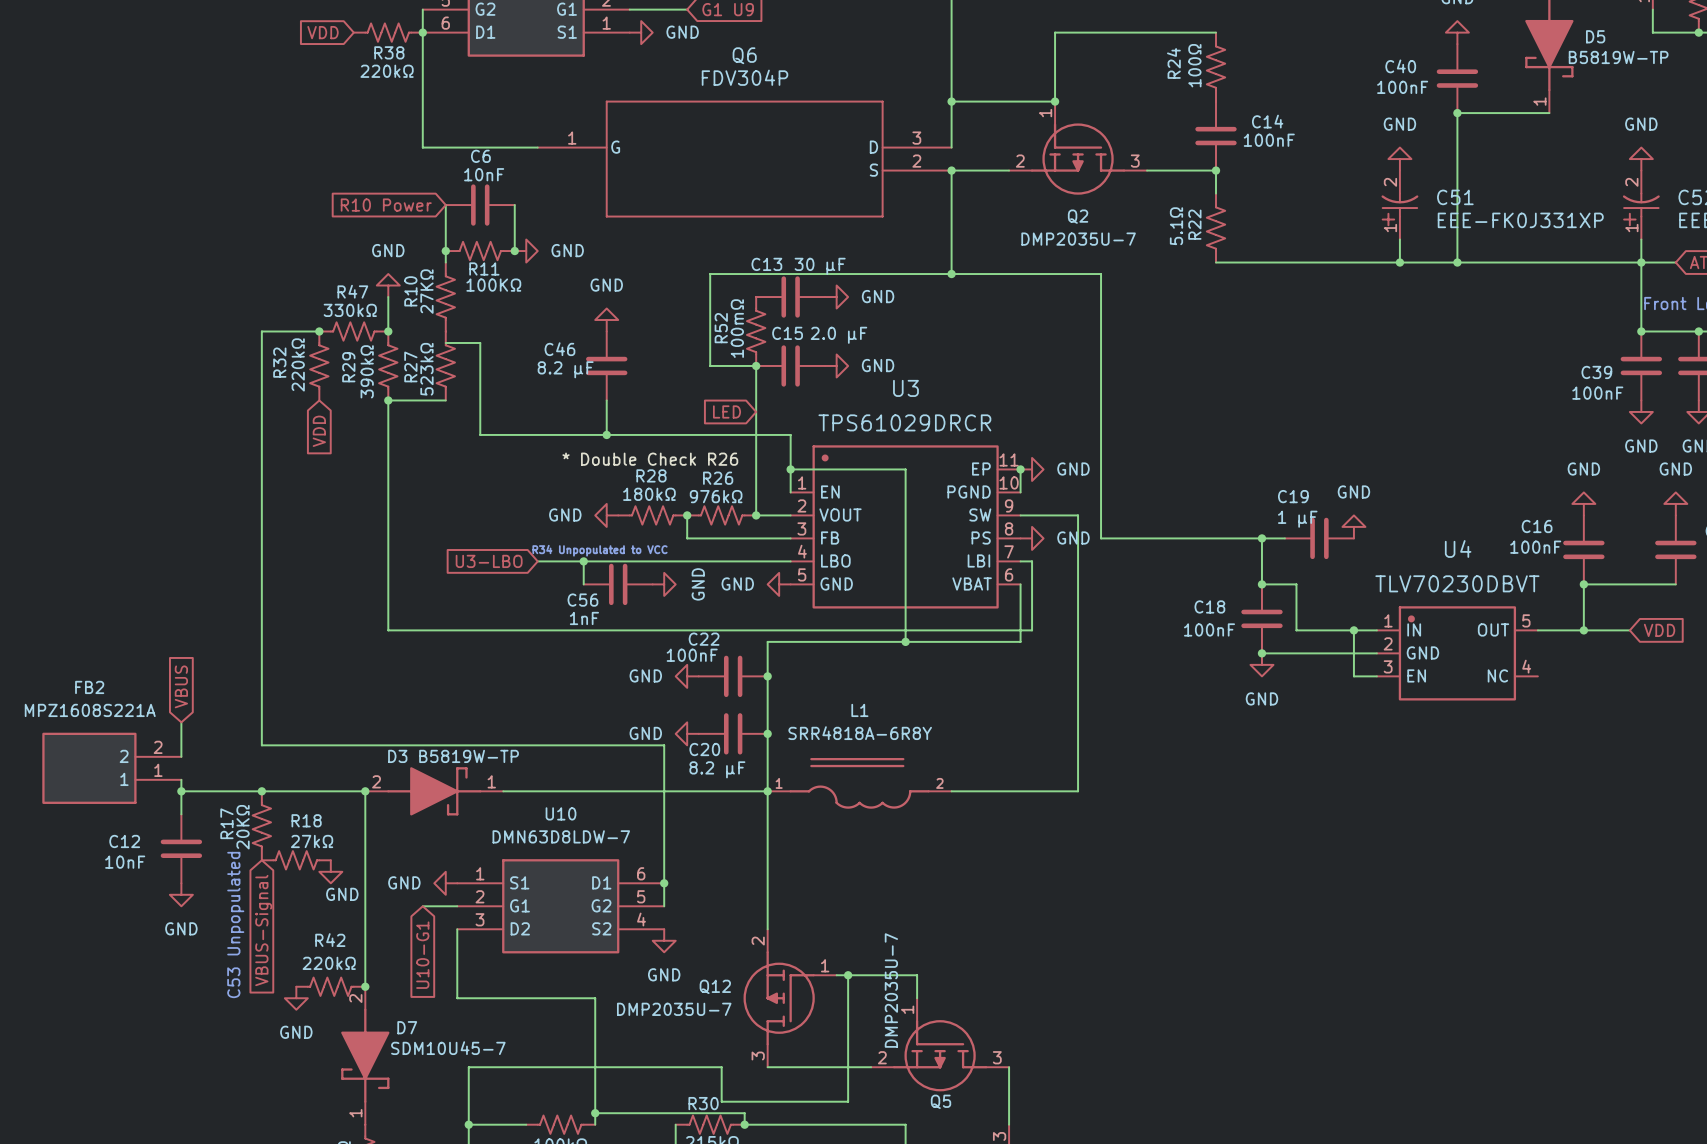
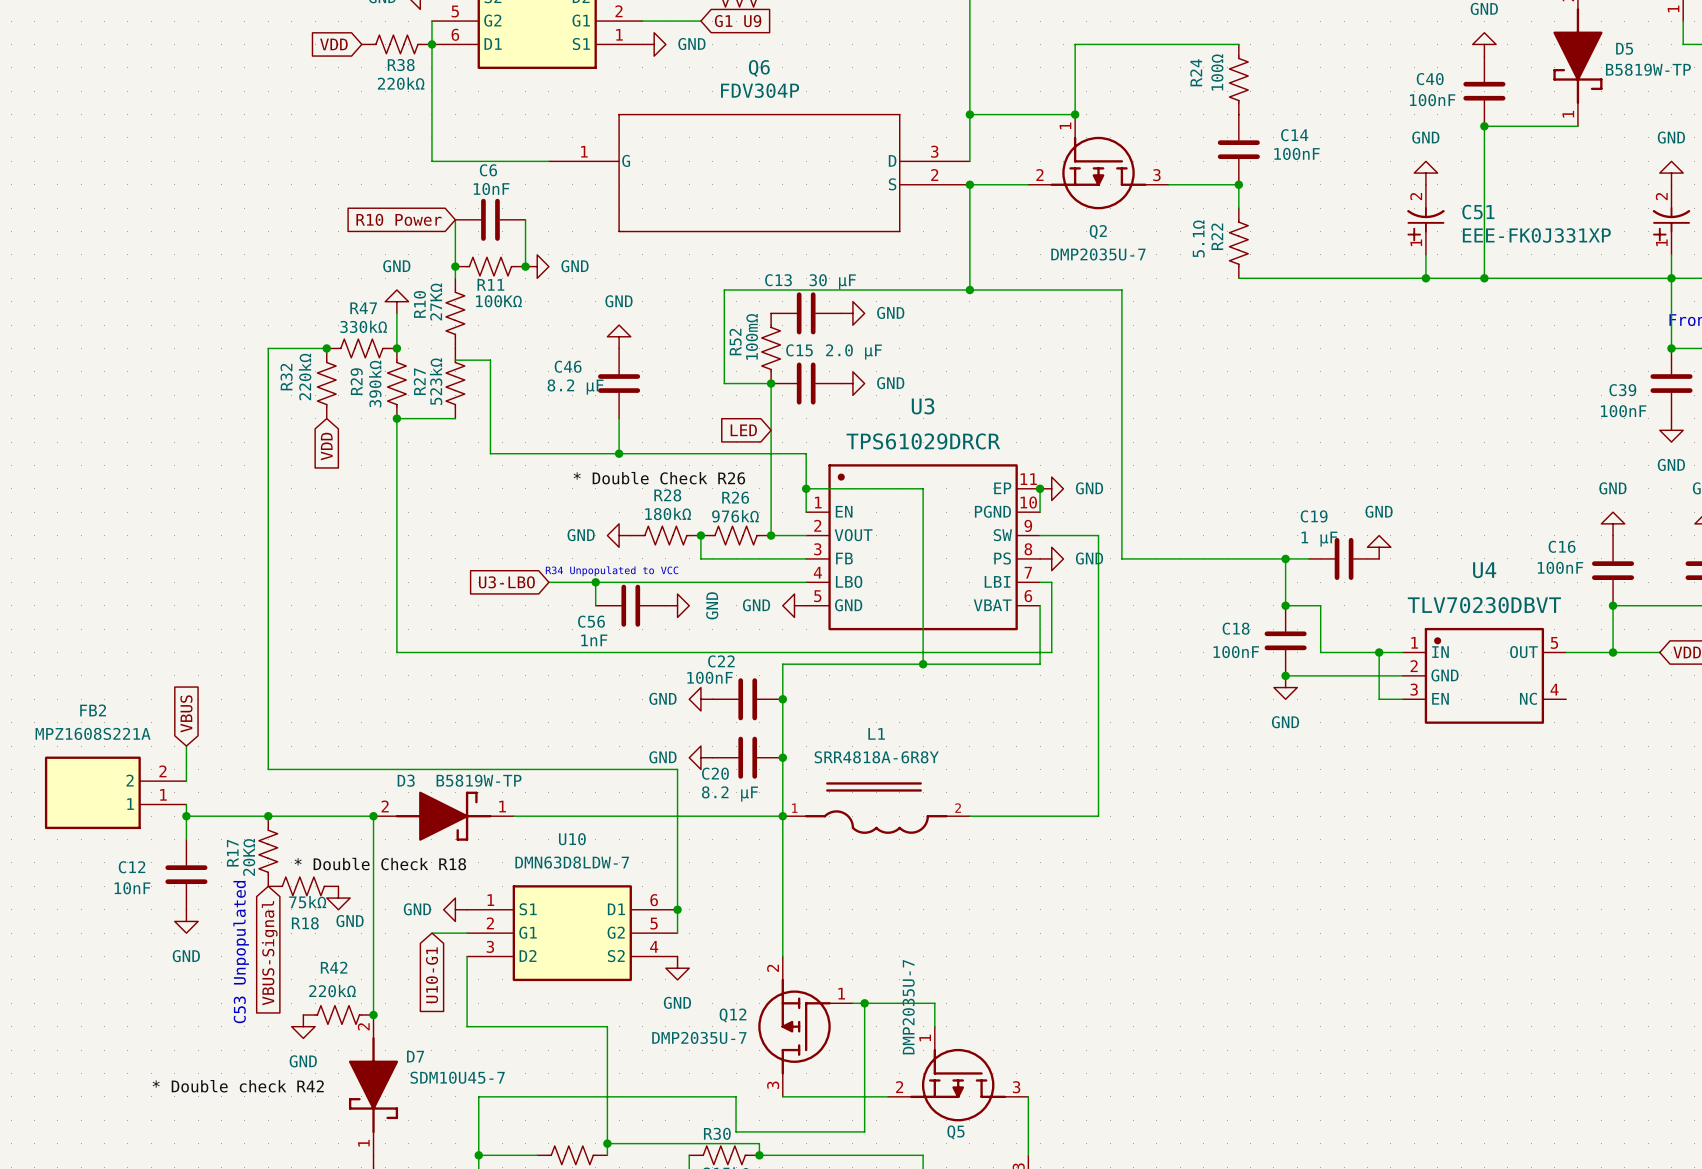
R18 name position: R18 (306, 820) -> R18 (305, 923)
label: none -> * Double Check R18 (380, 864)
R18 value: 27kΩ (312, 841) -> 75kΩ (307, 902)
label: none -> * Double check R42 (238, 1086)

